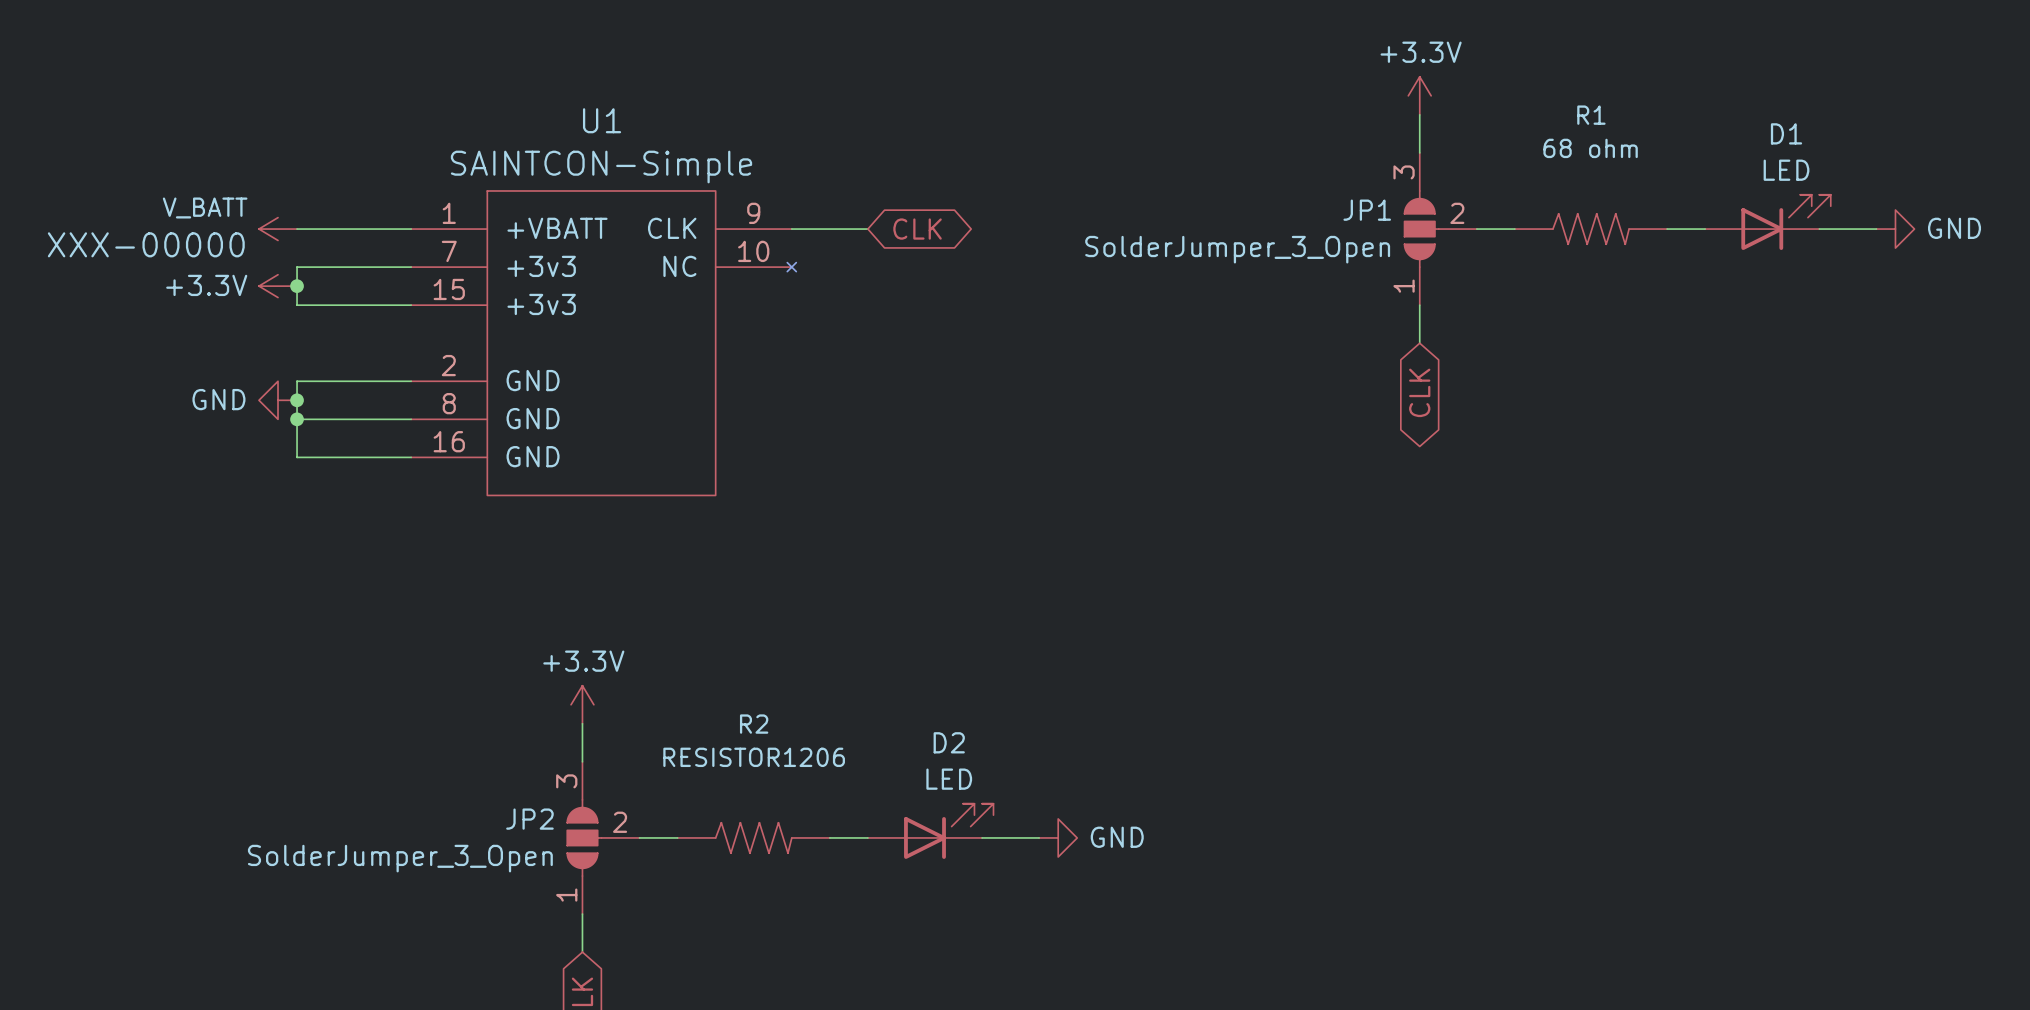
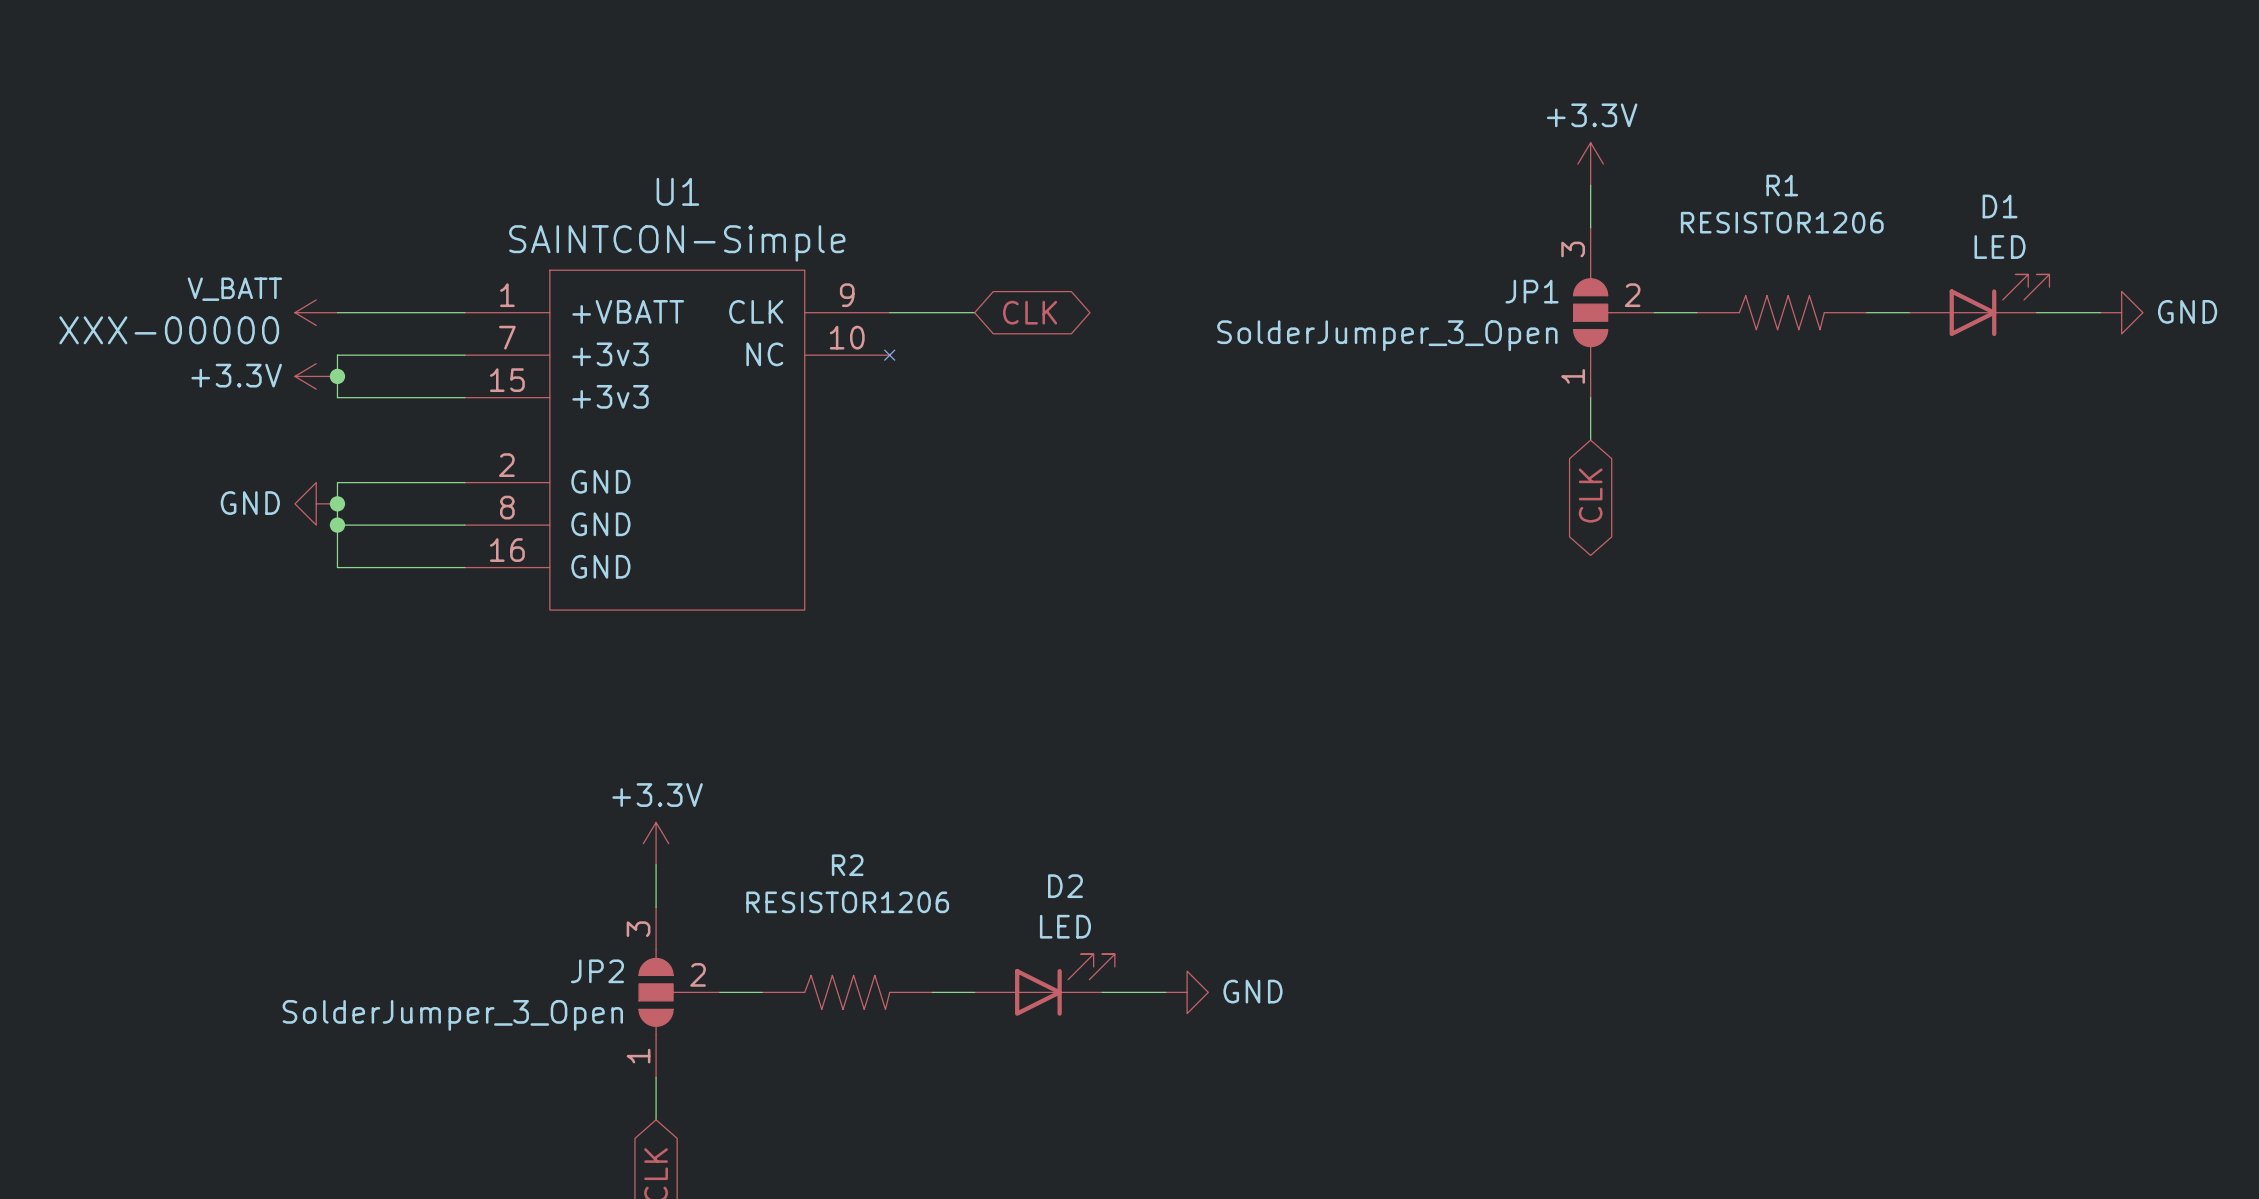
R1 value: 68 ohm (1590, 148) -> RESISTOR1206 (1782, 222)

